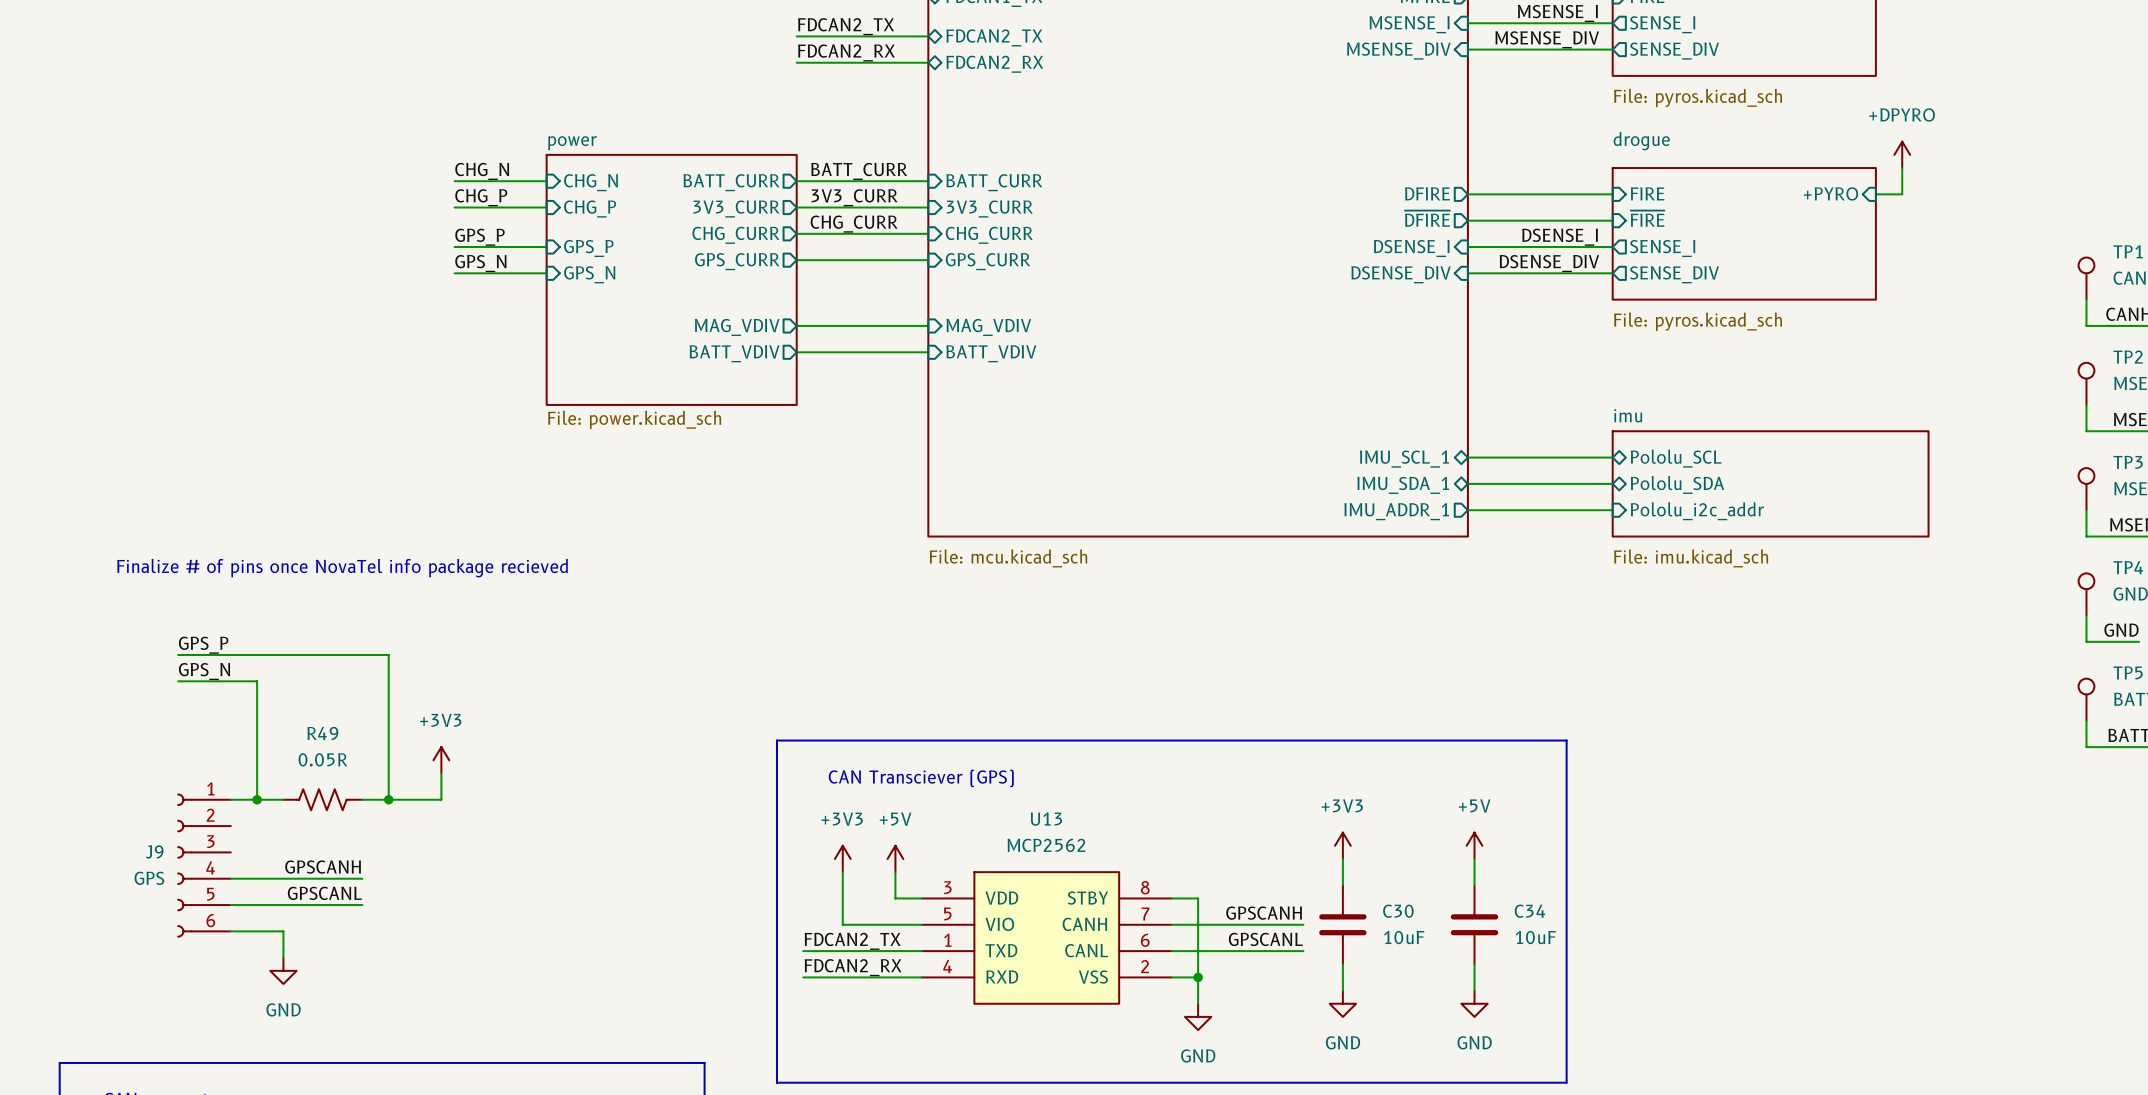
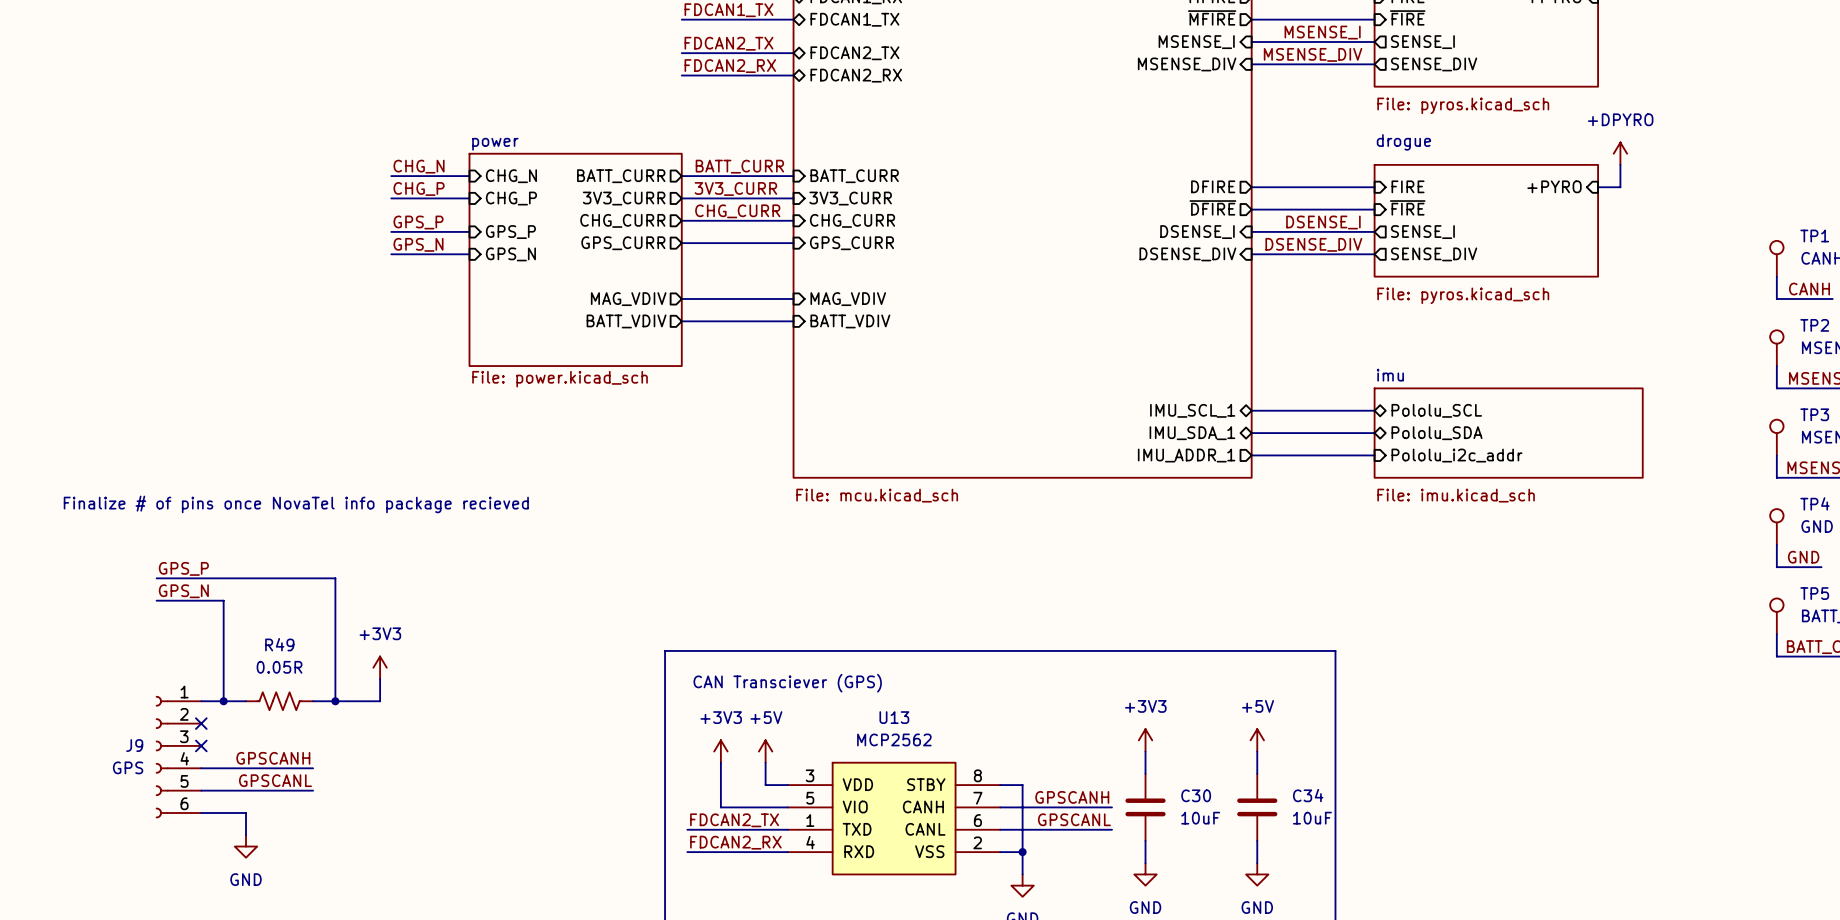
no-connect mark: none -> (201, 723)
no-connect mark: none -> (201, 745)

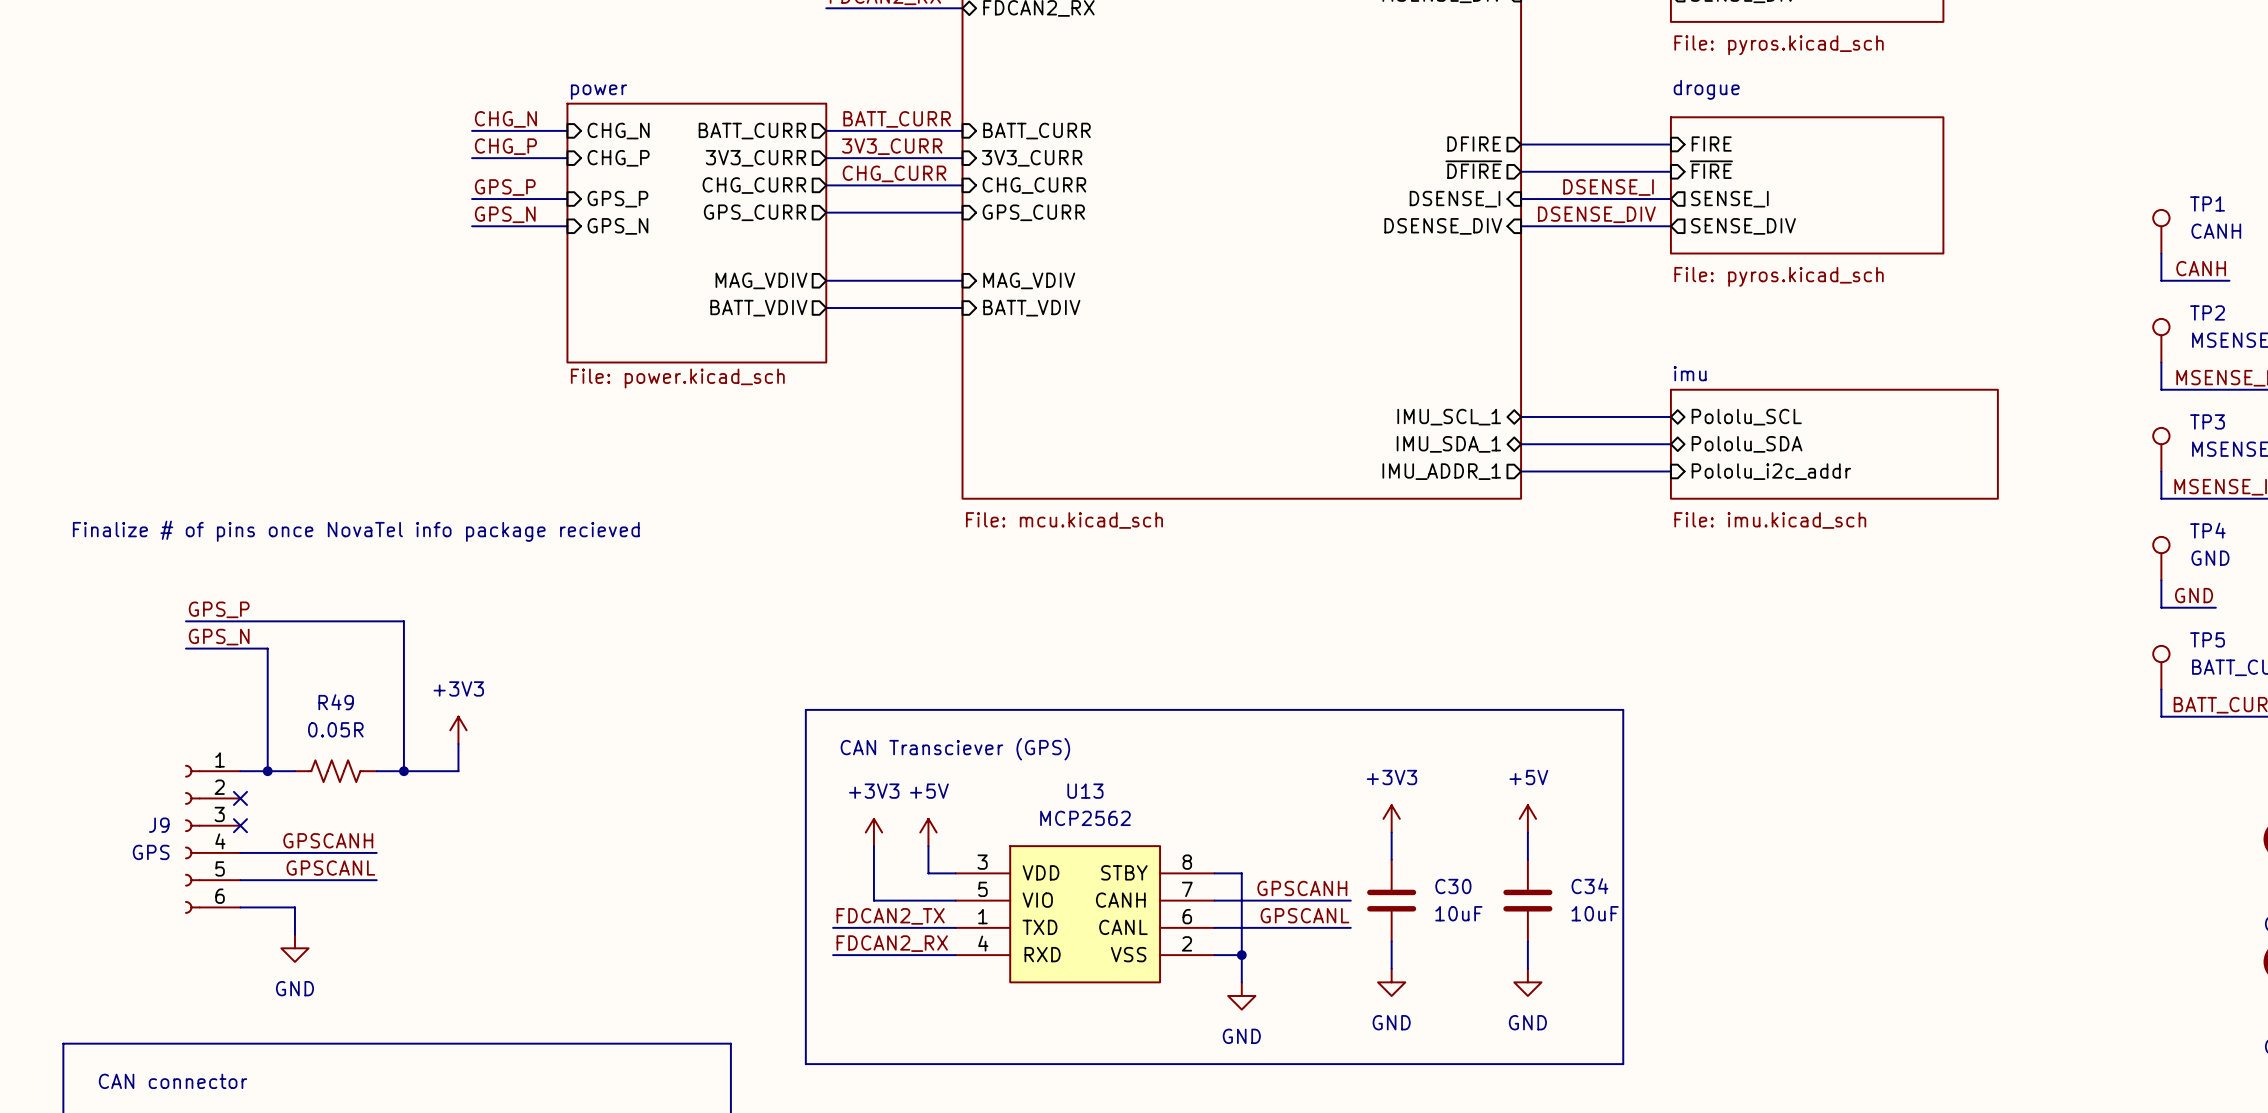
power symbol: +DPYRO (1620, 153) -> none
wire: (1620, 164) (1620, 187) (1598, 187) -> none
sheet pin: +PYRO (1554, 186) -> none

